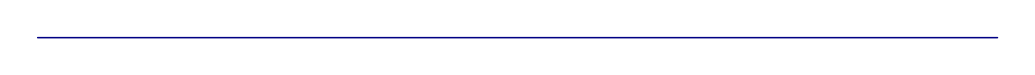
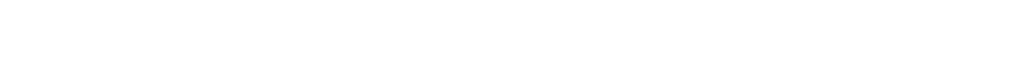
line: (37, 37) (997, 37) -> none

